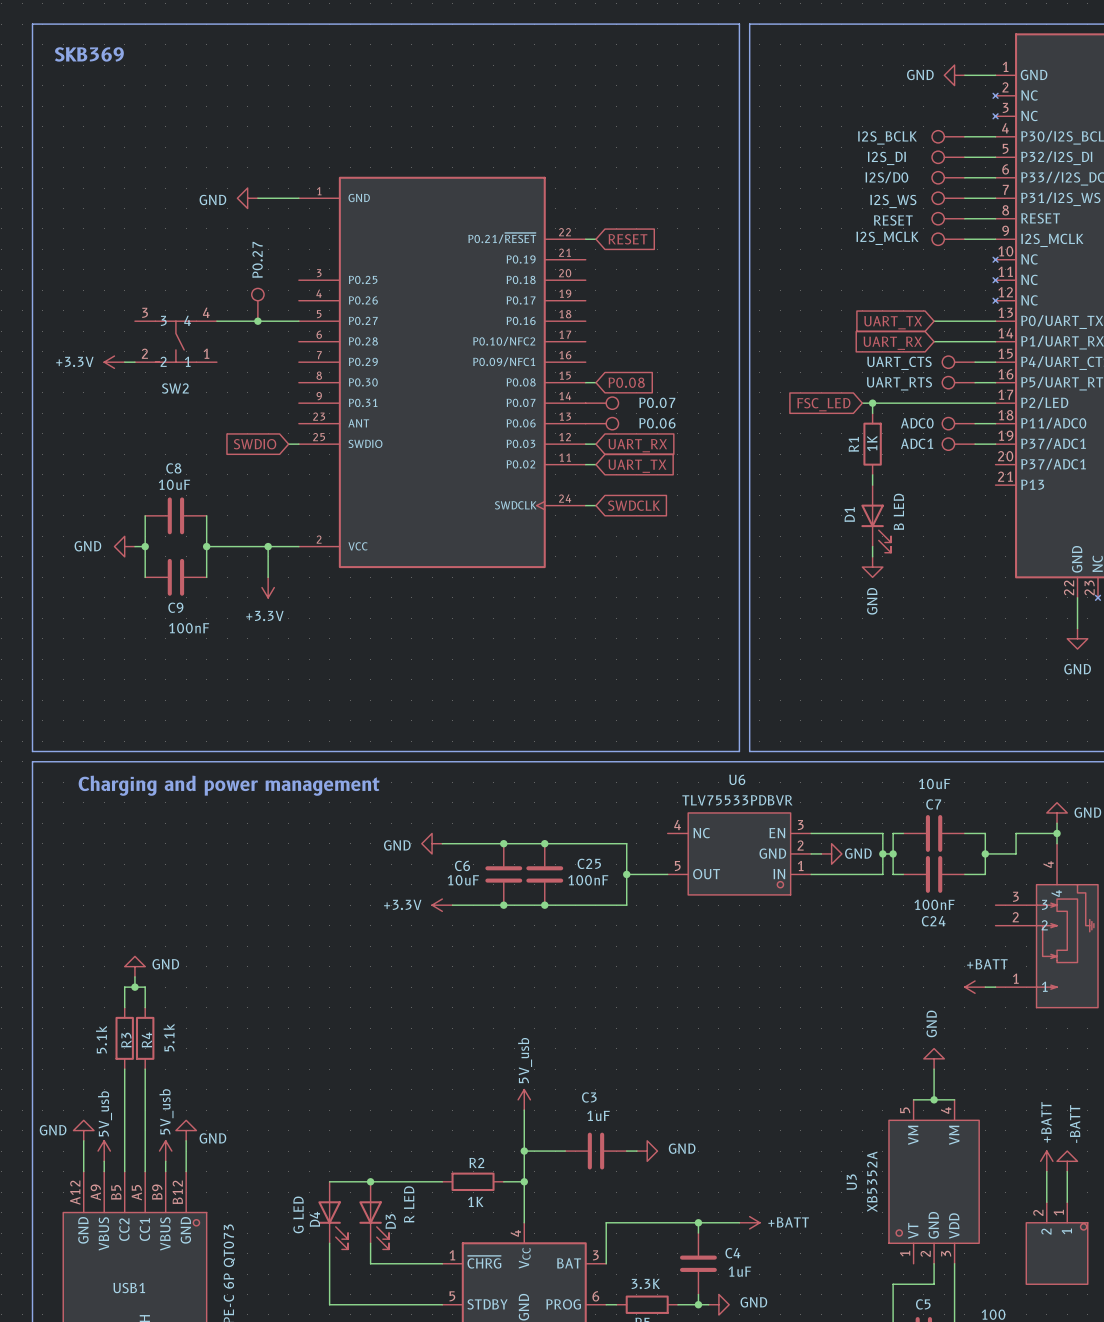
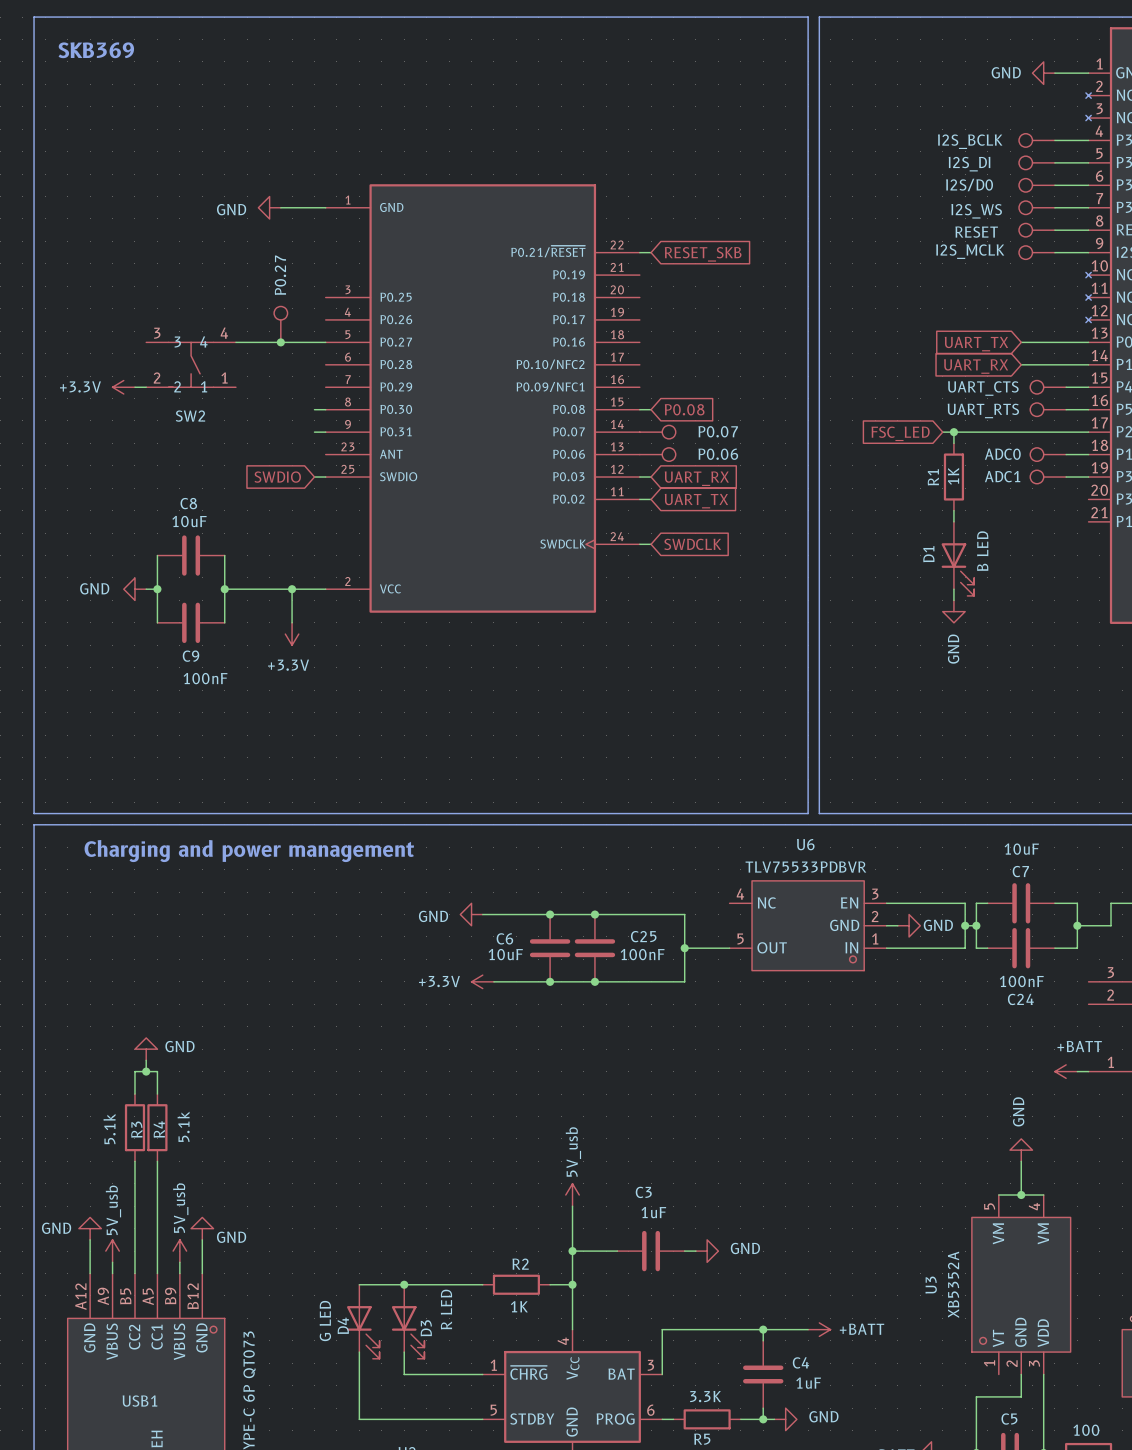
global label: RESET (627, 239) -> RESET_SKB (703, 254)
wire: none -> (314, 409) (325, 409)
wire: none -> (314, 432) (325, 432)

